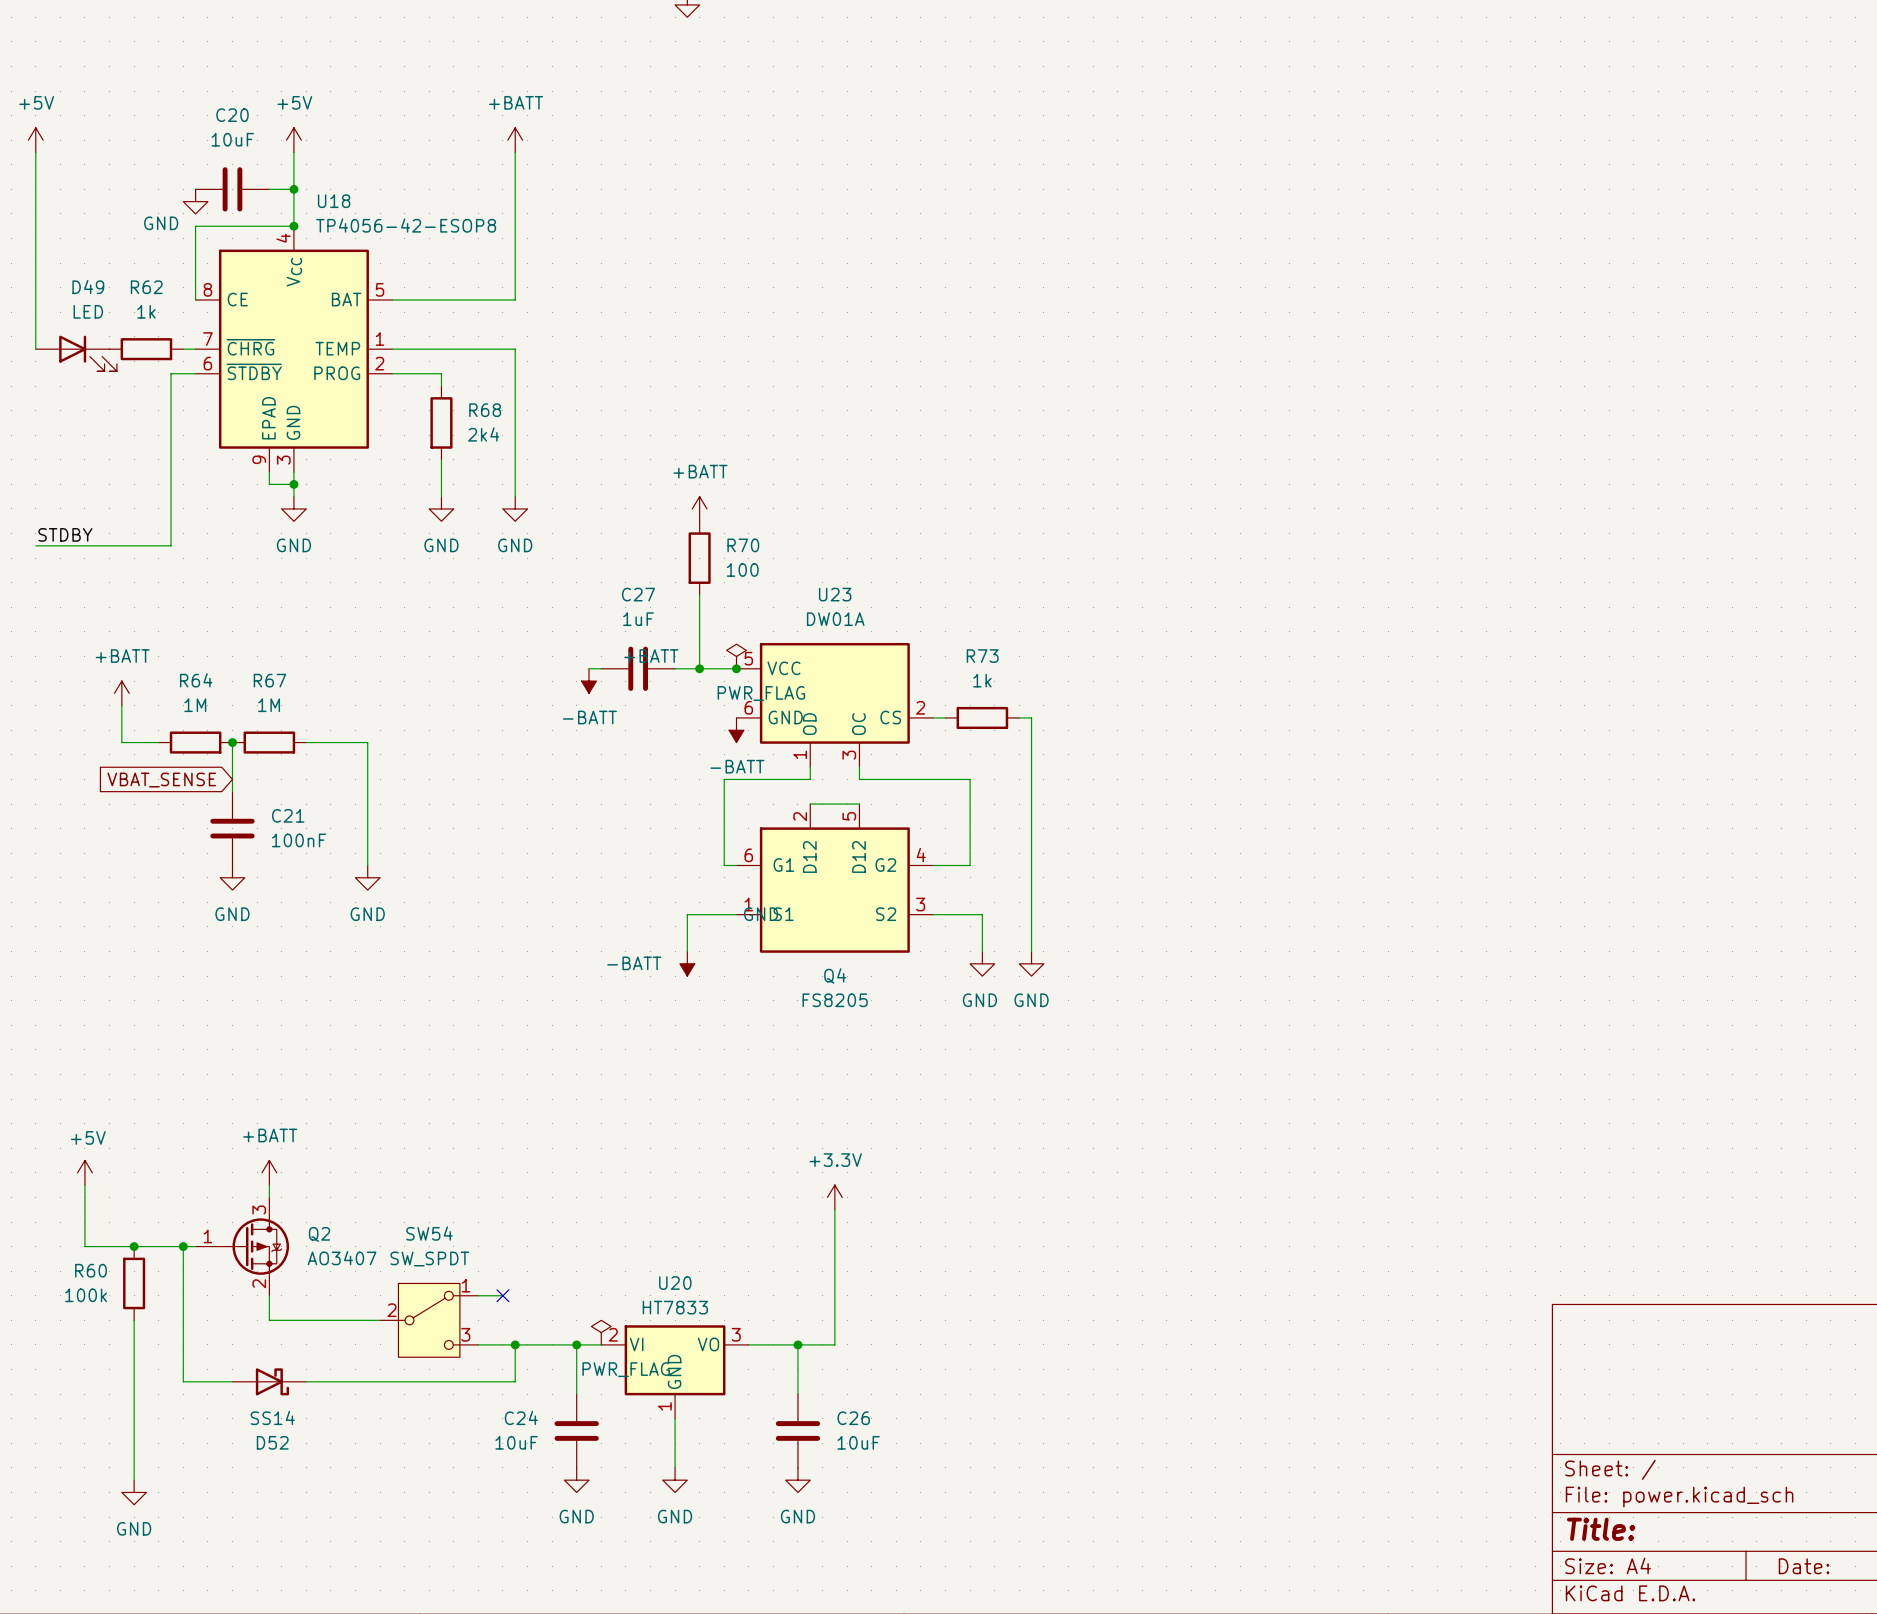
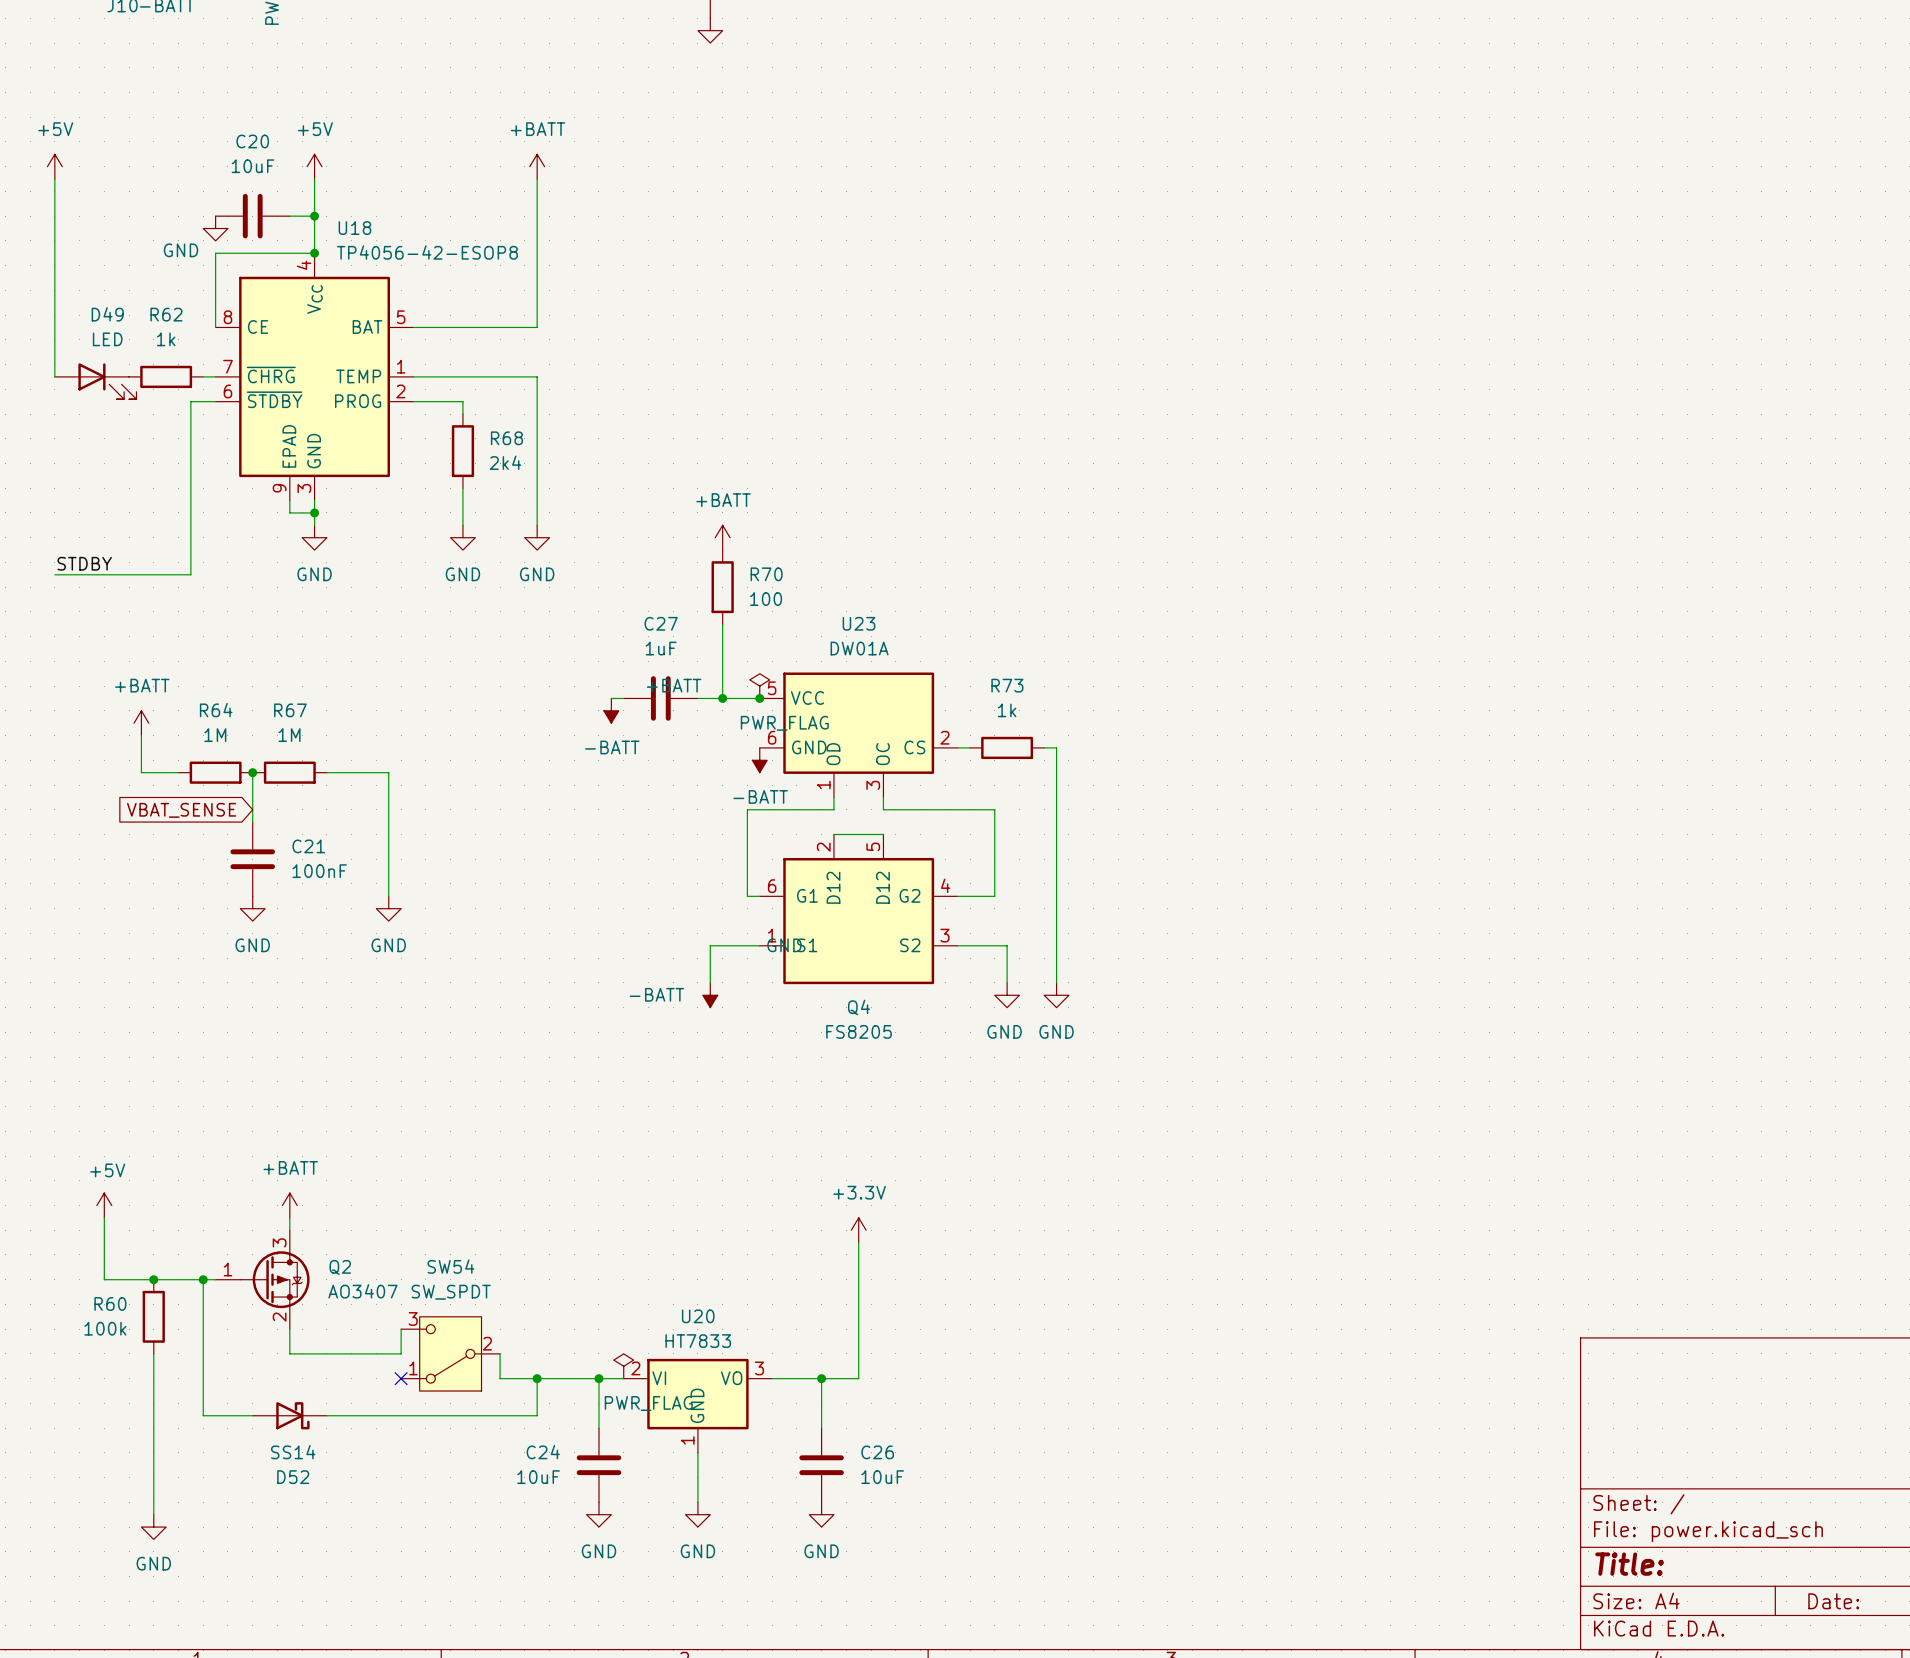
wire: none -> (401, 1329) (401, 1353)
wire: (478, 1295) (502, 1295) -> none
no-connect mark: (502, 1295) -> none
SW54 rotation: 0° (429, 1320) -> 180° (450, 1353)
wire: none -> (500, 1353) (500, 1378)
no-connect mark: none -> (401, 1378)

